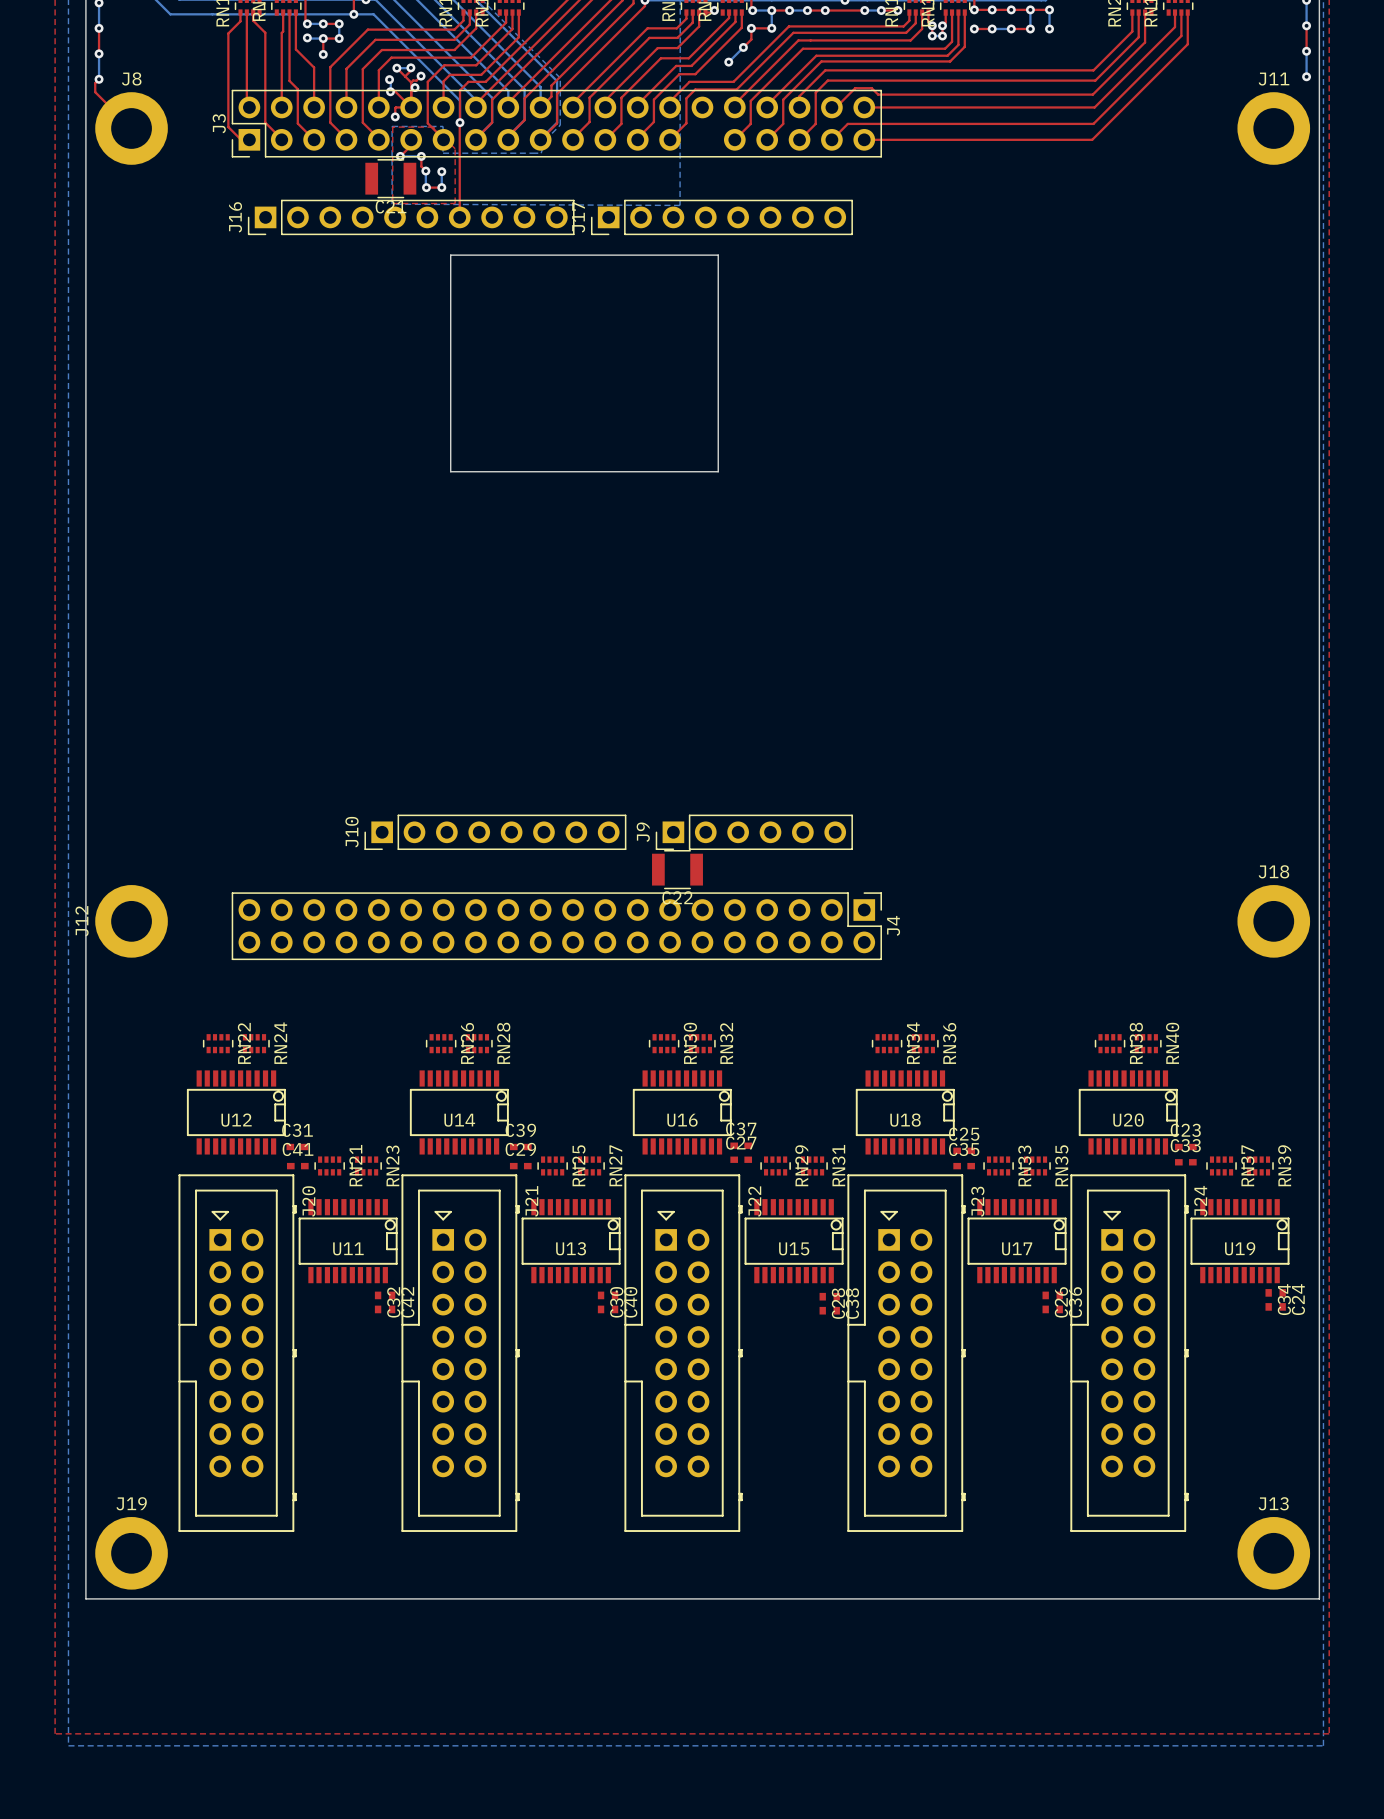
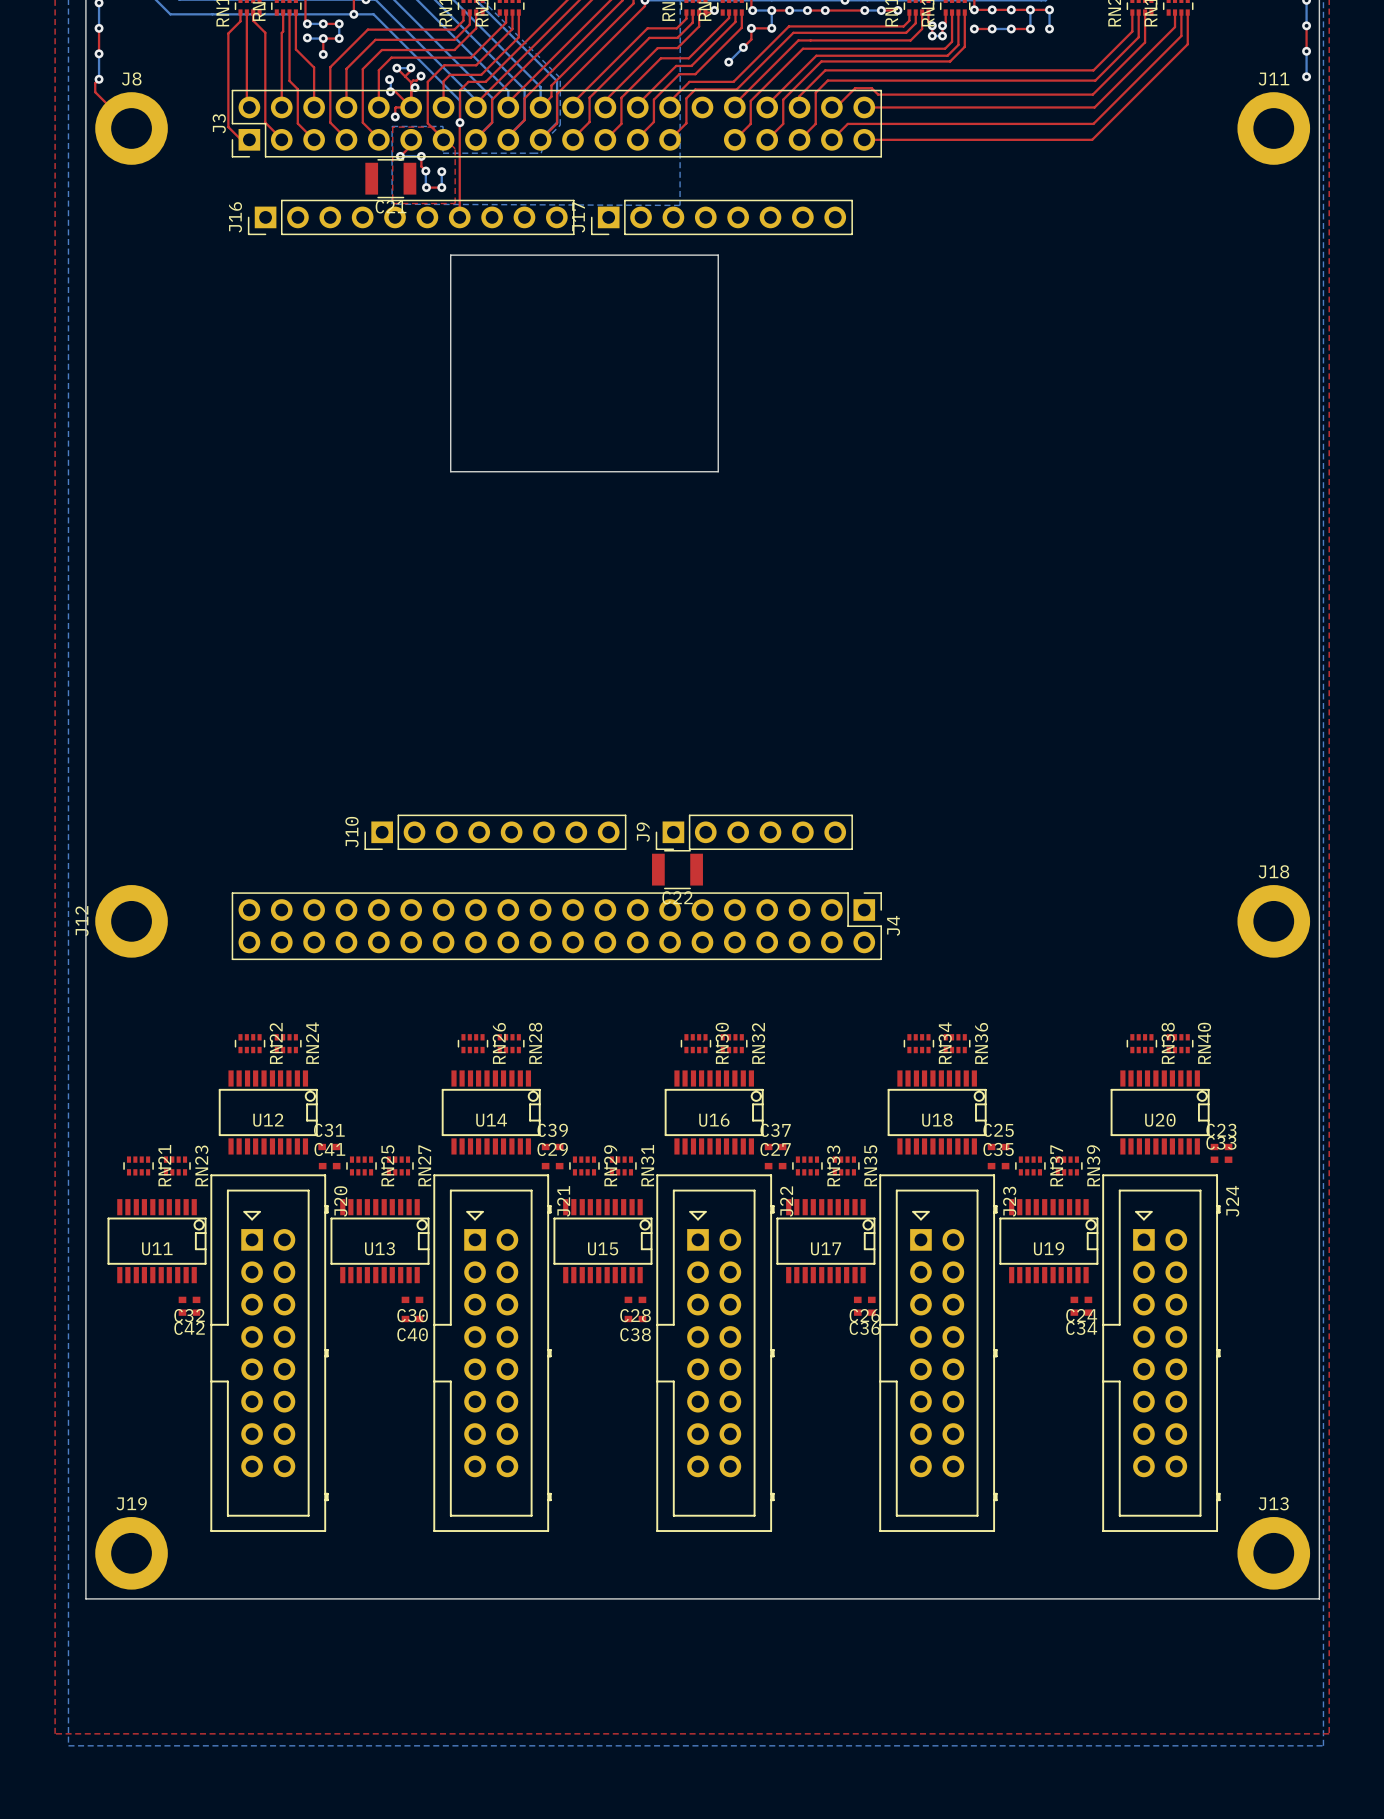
RN22 position: (218, 1043) -> (250, 1043)
RN24 position: (254, 1043) -> (286, 1043)
RN26 position: (441, 1043) -> (473, 1043)
RN28 position: (477, 1043) -> (509, 1043)
RN30 position: (664, 1043) -> (695, 1043)
RN32 position: (700, 1043) -> (732, 1043)
RN34 position: (887, 1043) -> (918, 1043)
RN36 position: (923, 1043) -> (955, 1043)
RN38 position: (1110, 1043) -> (1141, 1043)
RN40 position: (1146, 1043) -> (1178, 1043)
U12 position: (236, 1112) -> (268, 1112)
U14 position: (459, 1112) -> (491, 1112)
U16 position: (682, 1112) -> (714, 1112)
U18 position: (905, 1112) -> (937, 1112)
U20 position: (1128, 1112) -> (1160, 1112)
C37 position: (741, 1145) -> (775, 1147)
C31 position: (297, 1147) -> (329, 1147)
C39 position: (520, 1147) -> (552, 1147)
C23 position: (1185, 1147) -> (1221, 1147)
C25 position: (964, 1150) -> (998, 1147)
C27 position: (741, 1159) -> (775, 1166)
C33 position: (1185, 1162) -> (1221, 1159)
RN21 position: (329, 1165) -> (138, 1165)
RN23 position: (366, 1165) -> (175, 1165)
RN25 position: (552, 1165) -> (361, 1165)
RN27 position: (589, 1165) -> (398, 1165)
RN29 position: (775, 1165) -> (584, 1165)
RN31 position: (812, 1165) -> (621, 1165)
RN33 position: (998, 1165) -> (807, 1165)
RN35 position: (1035, 1165) -> (844, 1165)
RN37 position: (1221, 1165) -> (1030, 1165)
RN39 position: (1258, 1165) -> (1067, 1165)
C41 position: (297, 1166) -> (329, 1166)
C29 position: (520, 1166) -> (552, 1166)
C35 position: (964, 1166) -> (998, 1166)
U11 position: (348, 1241) -> (157, 1241)
U13 position: (571, 1241) -> (379, 1241)
U15 position: (794, 1241) -> (602, 1241)
U17 position: (1017, 1241) -> (825, 1241)
U19 position: (1240, 1241) -> (1048, 1241)
C34 rotation: 0° (1268, 1299) -> 90° clockwise (1081, 1312)
C34 position: (1268, 1299) -> (1081, 1312)
C24 rotation: 0° (1282, 1299) -> 90° clockwise (1081, 1299)
C24 position: (1282, 1299) -> (1081, 1299)
C32 rotation: 0° (378, 1302) -> 90° clockwise (189, 1299)
C32 position: (378, 1302) -> (189, 1299)
C42 rotation: 0° (392, 1302) -> 90° clockwise (189, 1312)
C42 position: (392, 1302) -> (189, 1312)
C30 rotation: 0° (601, 1302) -> 90° clockwise (412, 1299)
C30 position: (601, 1302) -> (412, 1299)
C40 rotation: 0° (615, 1302) -> 90° clockwise (412, 1319)
C40 position: (615, 1302) -> (412, 1319)
C26 rotation: 0° (1045, 1302) -> 90° clockwise (864, 1299)
C26 position: (1045, 1302) -> (864, 1299)
C36 rotation: 0° (1059, 1302) -> 90° clockwise (864, 1312)
C36 position: (1059, 1302) -> (864, 1312)
C28 rotation: 0° (822, 1303) -> 90° clockwise (635, 1299)
C28 position: (822, 1303) -> (635, 1299)
C38 rotation: 0° (836, 1303) -> 90° clockwise (635, 1319)
C38 position: (836, 1303) -> (635, 1319)
J20 position: (237, 1353) -> (269, 1353)
J21 position: (460, 1353) -> (492, 1353)
J22 position: (683, 1353) -> (715, 1353)
J23 position: (906, 1353) -> (938, 1353)
J24 position: (1129, 1353) -> (1161, 1353)

